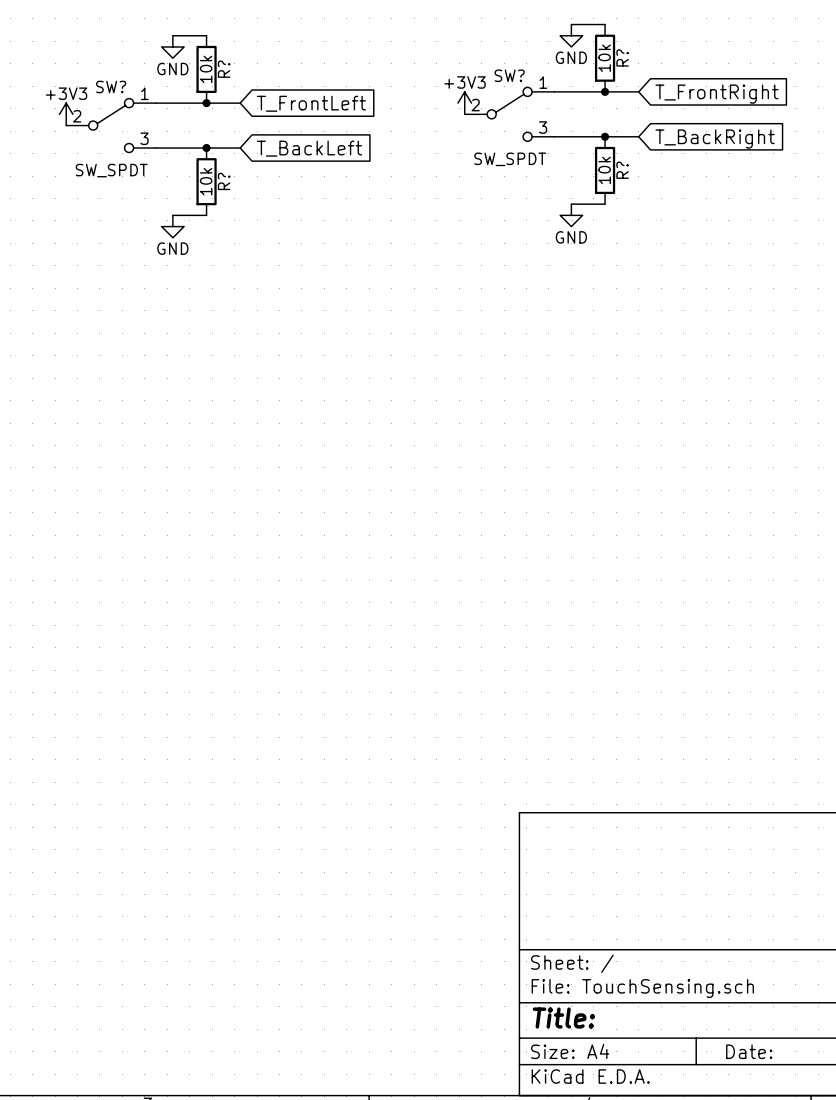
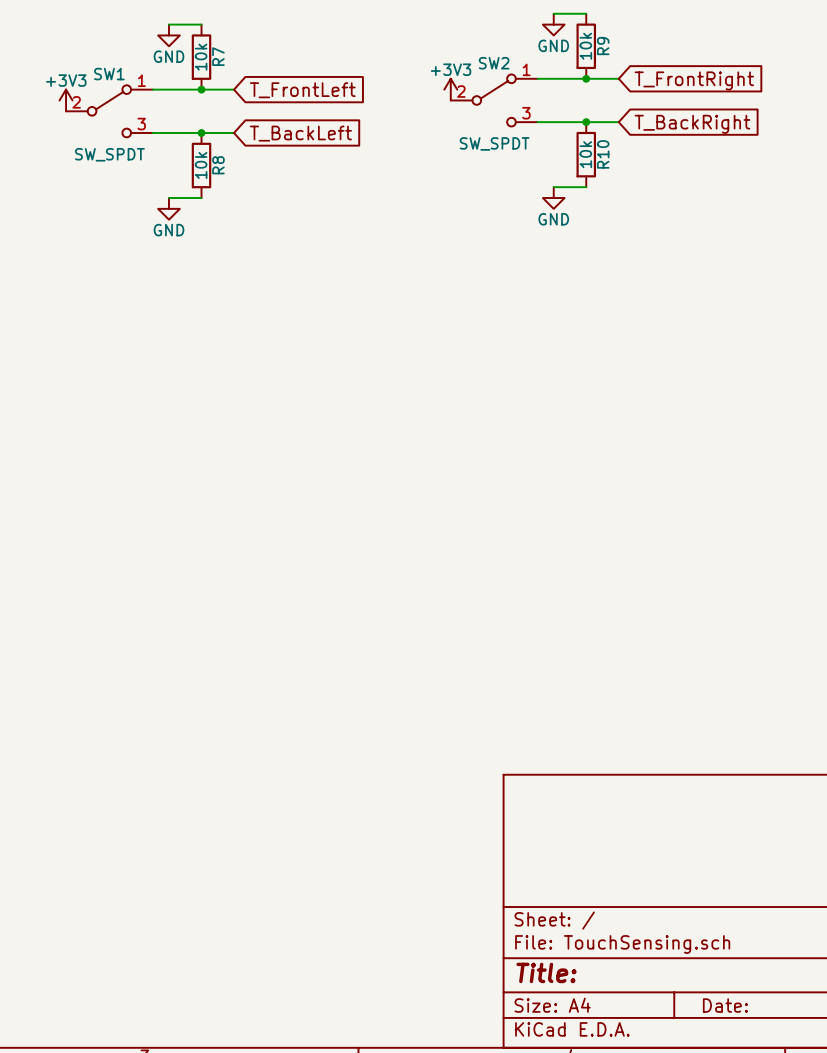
R? name: R? (622, 57) -> R9 (603, 46)
R? name: R? (224, 69) -> R7 (218, 56)
SW? name: SW? (509, 75) -> SW2 (494, 63)
SW? name: SW? (111, 86) -> SW1 (109, 74)
R? name: R? (622, 170) -> R10 (603, 154)
R? name: R? (224, 181) -> R8 (218, 165)

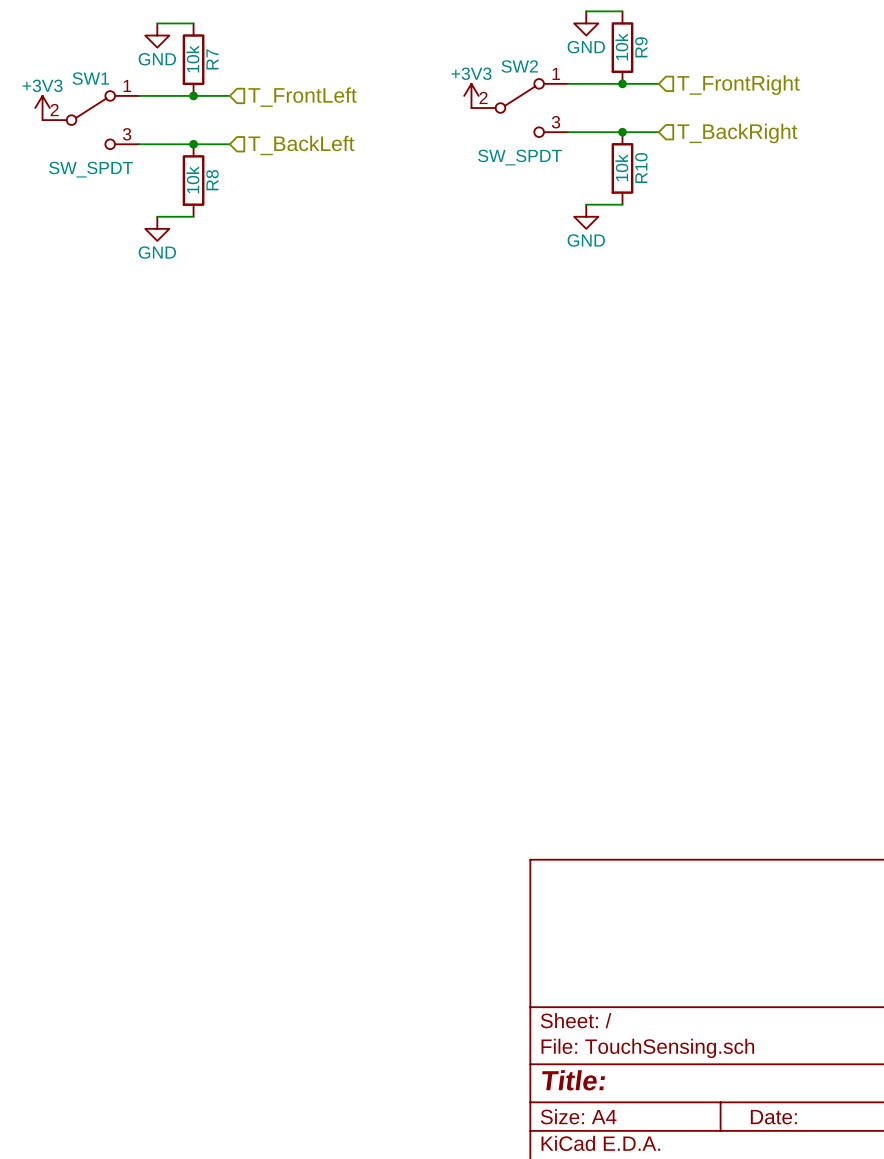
global label: T_FrontRight (694, 80) -> none
hierarchical label: none -> T_FrontRight (738, 85)
hierarchical label: none -> T_FrontLeft (302, 97)
global label: T_FrontLeft (302, 90) -> none
hierarchical label: none -> T_BackRight (737, 133)
global label: T_BackRight (692, 124) -> none
global label: T_BackLeft (300, 133) -> none
hierarchical label: none -> T_BackLeft (301, 145)

